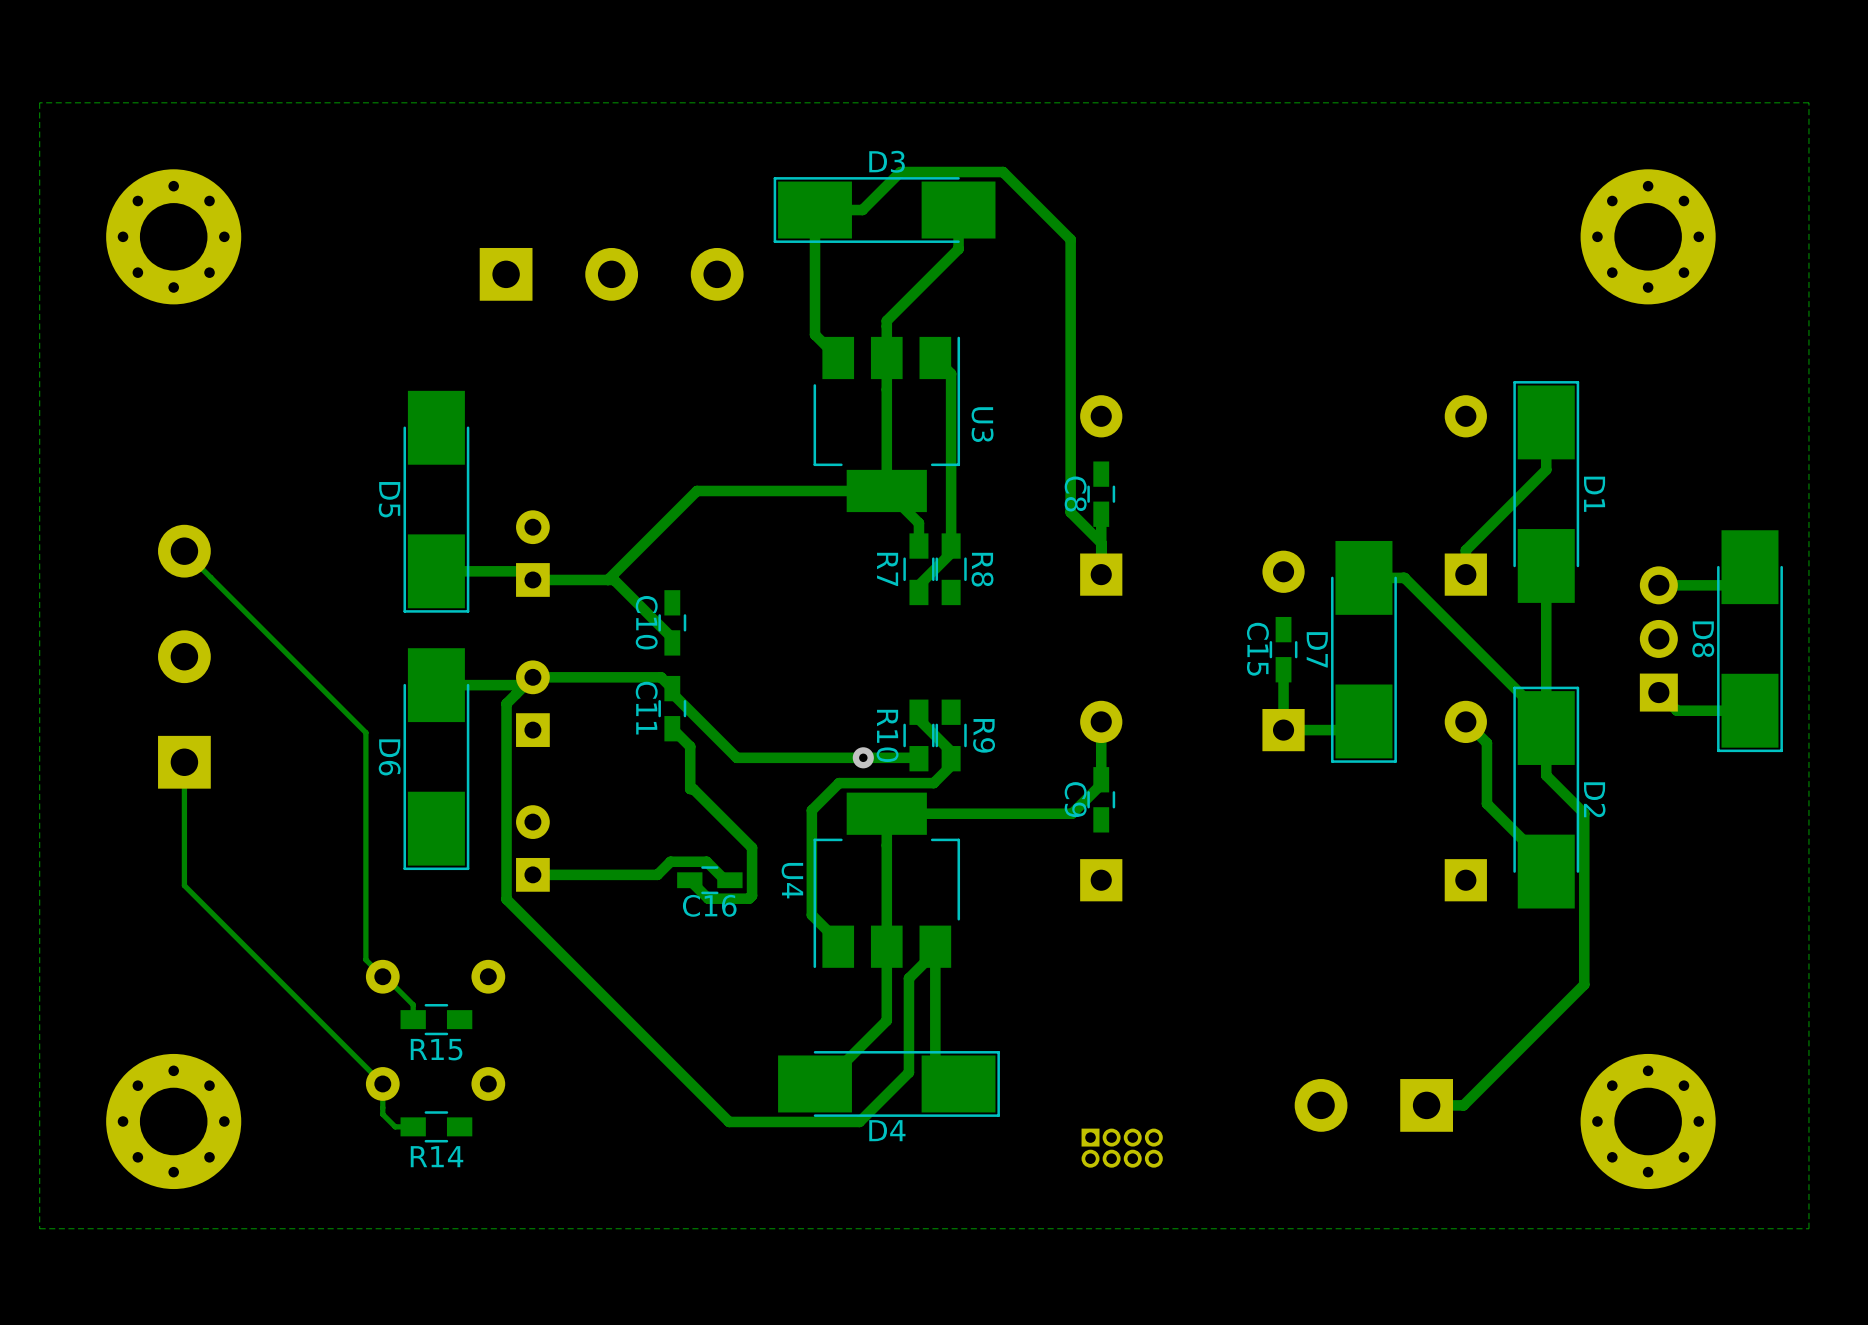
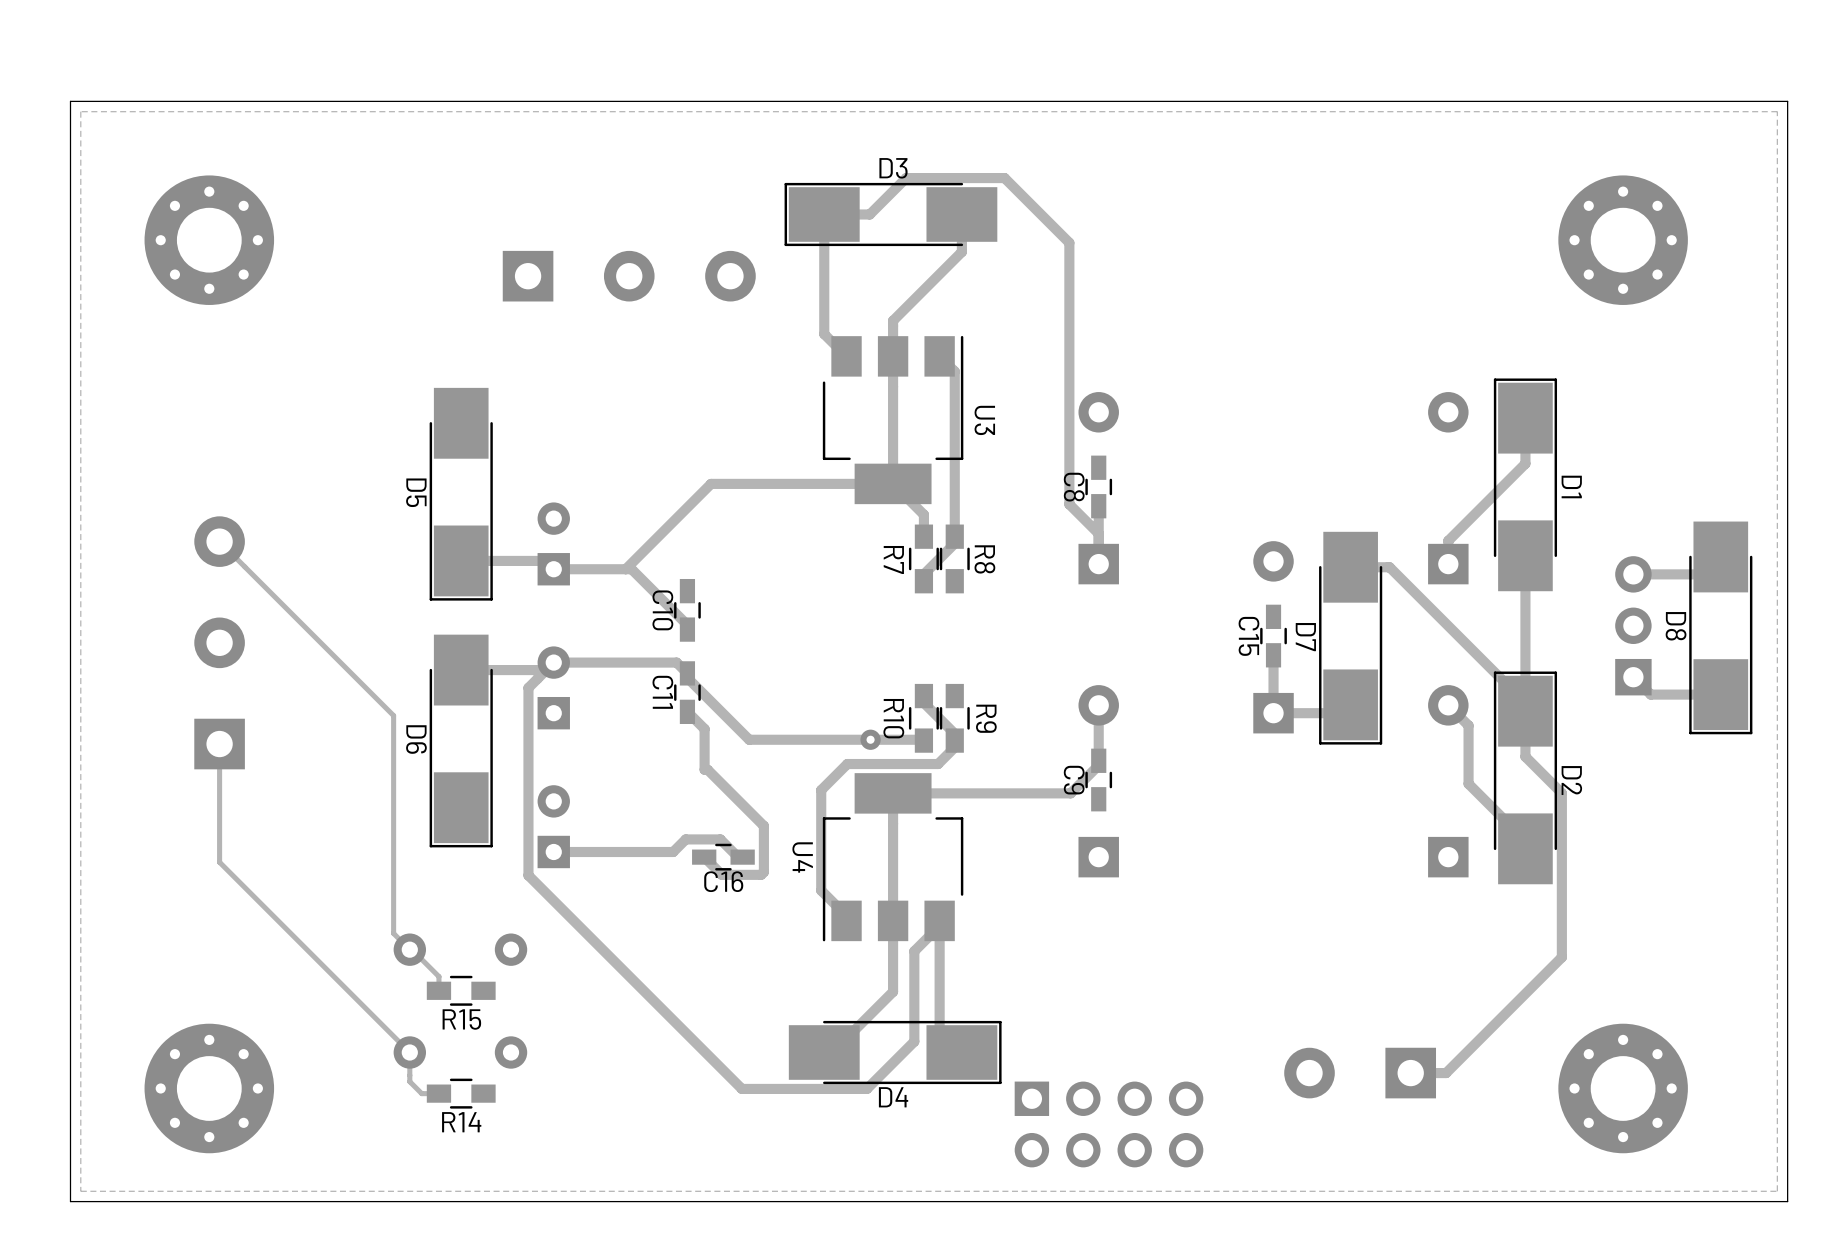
board edge: none -> (1787, 101) (1787, 1201) (70, 1201) (70, 101) (1787, 101)
part footprint: [1081, 1128, 1163, 1168] -> [1014, 1081, 1204, 1168]

